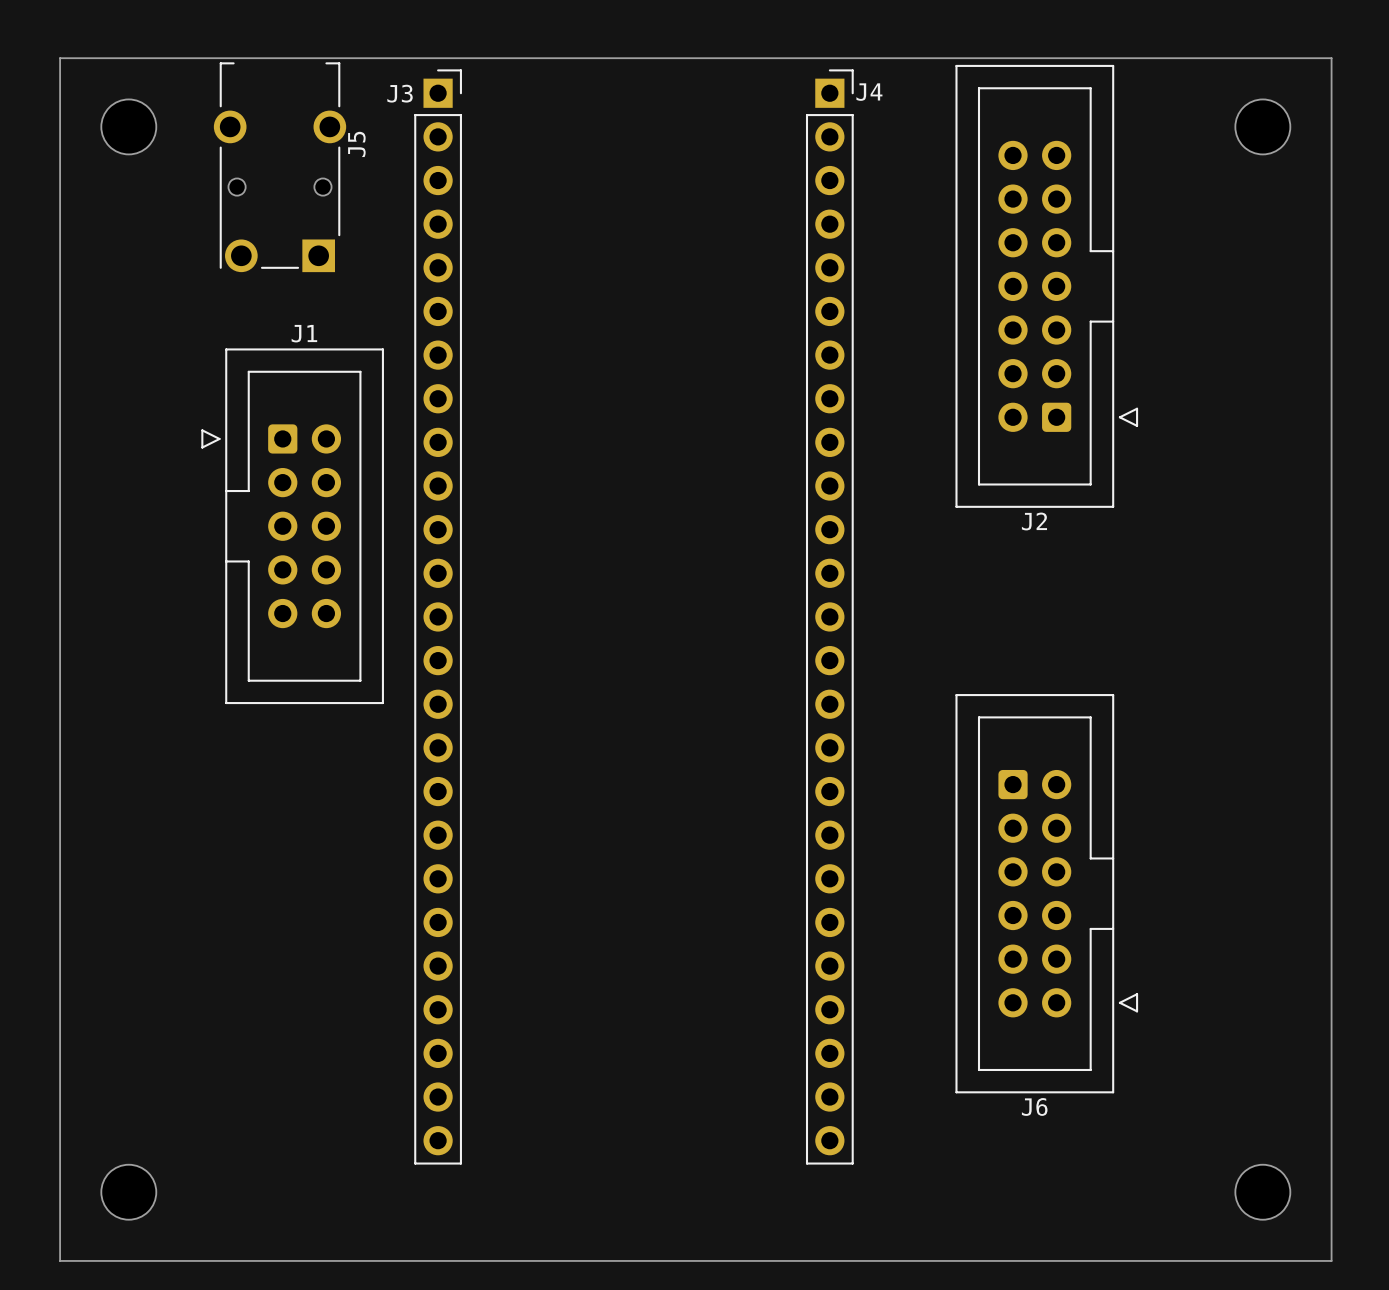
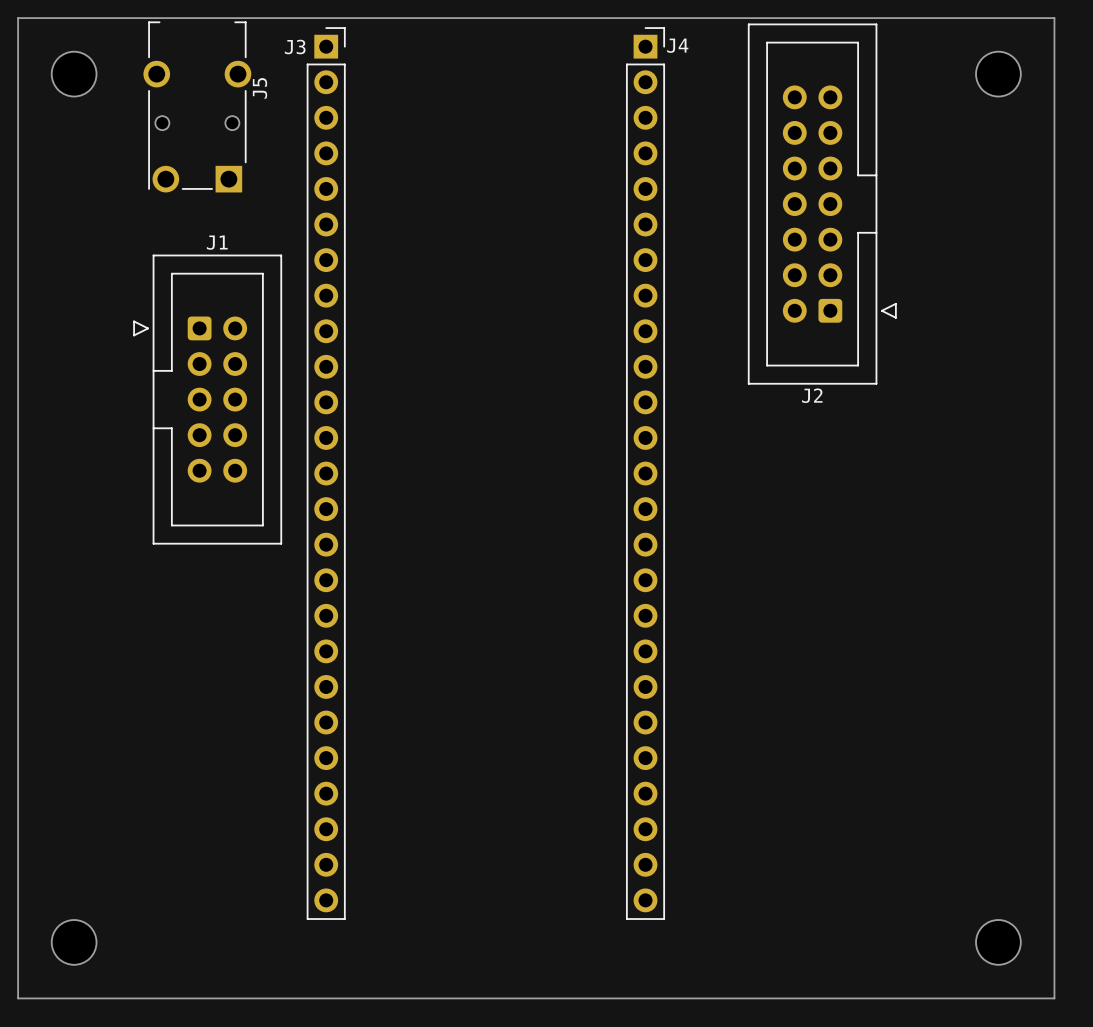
J6: (1046, 893) -> none

